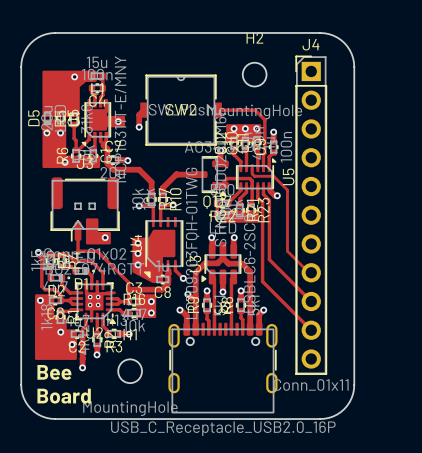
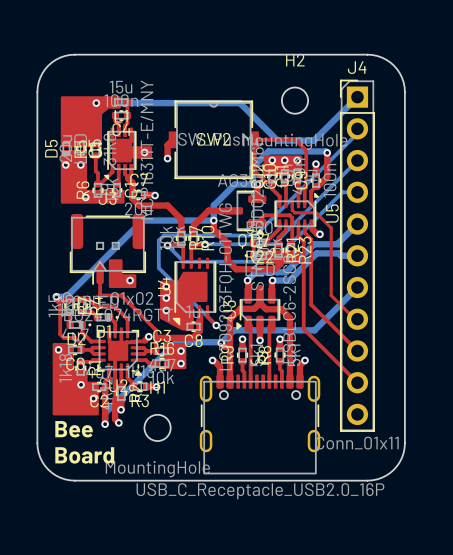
bottom track: none -> (357, 97) (313, 140) (277, 140) (240, 103) (96, 103)
bottom track: none -> (357, 128) (357, 133) (255, 235) (163, 235) (158, 240) (158, 268) (216, 325)
top track: none -> (254, 139) (254, 171) (265, 182) (272, 182)
top track: none -> (327, 152) (327, 176) (315, 186)
bottom track: none -> (327, 152) (268, 151) (252, 167) (252, 184) (234, 184) (213, 205) (213, 220) (142, 220) (66, 296) (56, 296)
via: none -> (327, 152)
bottom track: none -> (357, 160) (273, 244) (205, 244)
bottom track: none -> (357, 192) (342, 192) (272, 261) (183, 261) (167, 245)
top track: none -> (213, 220) (213, 229) (227, 243) (227, 260) (236, 269) (275, 269) (280, 263) (280, 257)
via: none -> (213, 220)
bottom track: none -> (357, 224) (338, 244) (314, 244) (286, 272) (255, 272) (247, 280)
bottom track: none -> (357, 255) (316, 253) (289, 280) (272, 280)
bottom track: none -> (357, 287) (314, 330) (233, 330) (221, 342) (176, 342) (105, 413) (105, 424)
top track: none -> (148, 336) (144, 341) (136, 341)
via: none -> (148, 336)
via: (90, 297) -> none
via: (98, 297) -> none
via: (90, 305) -> none
via: (98, 305) -> none
top track: none -> (115, 368) (115, 419) (118, 422)
via: none -> (118, 422)

